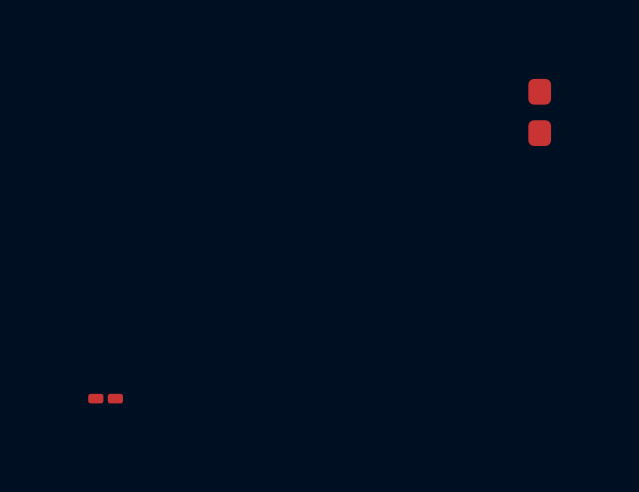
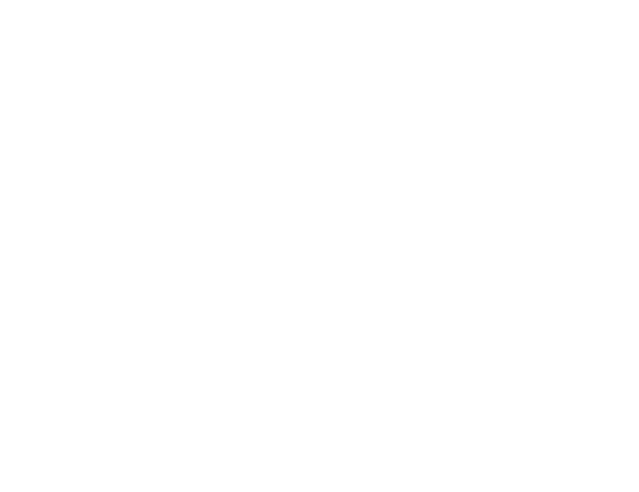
part: (539, 112) -> none
part: (105, 398) -> none

